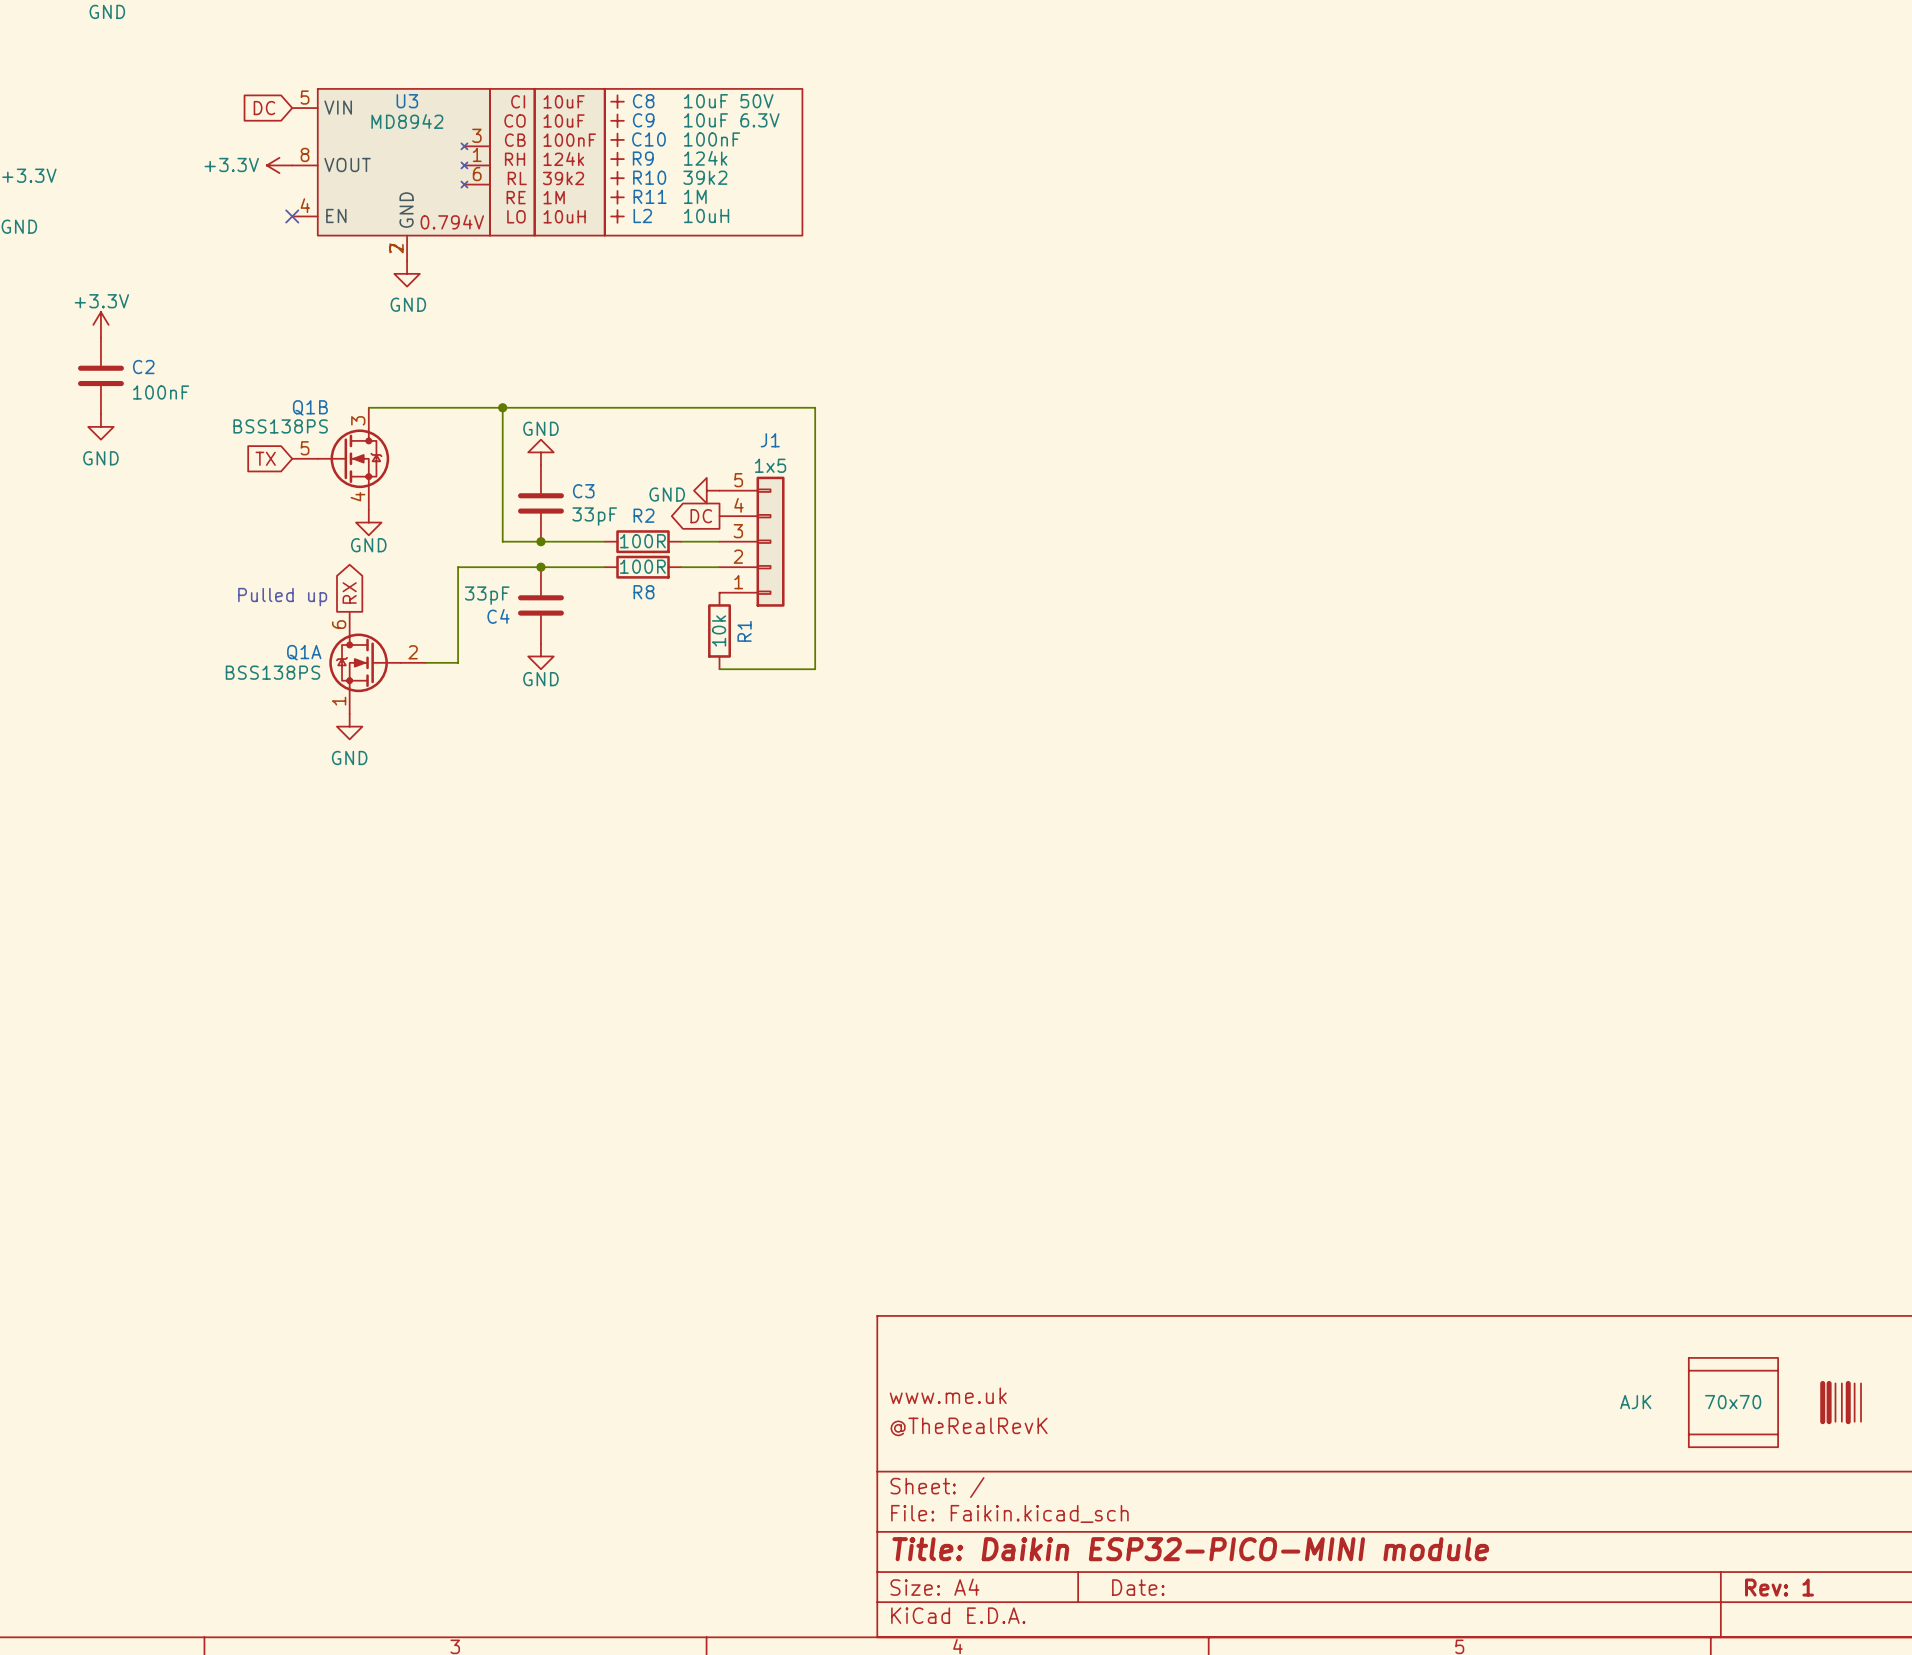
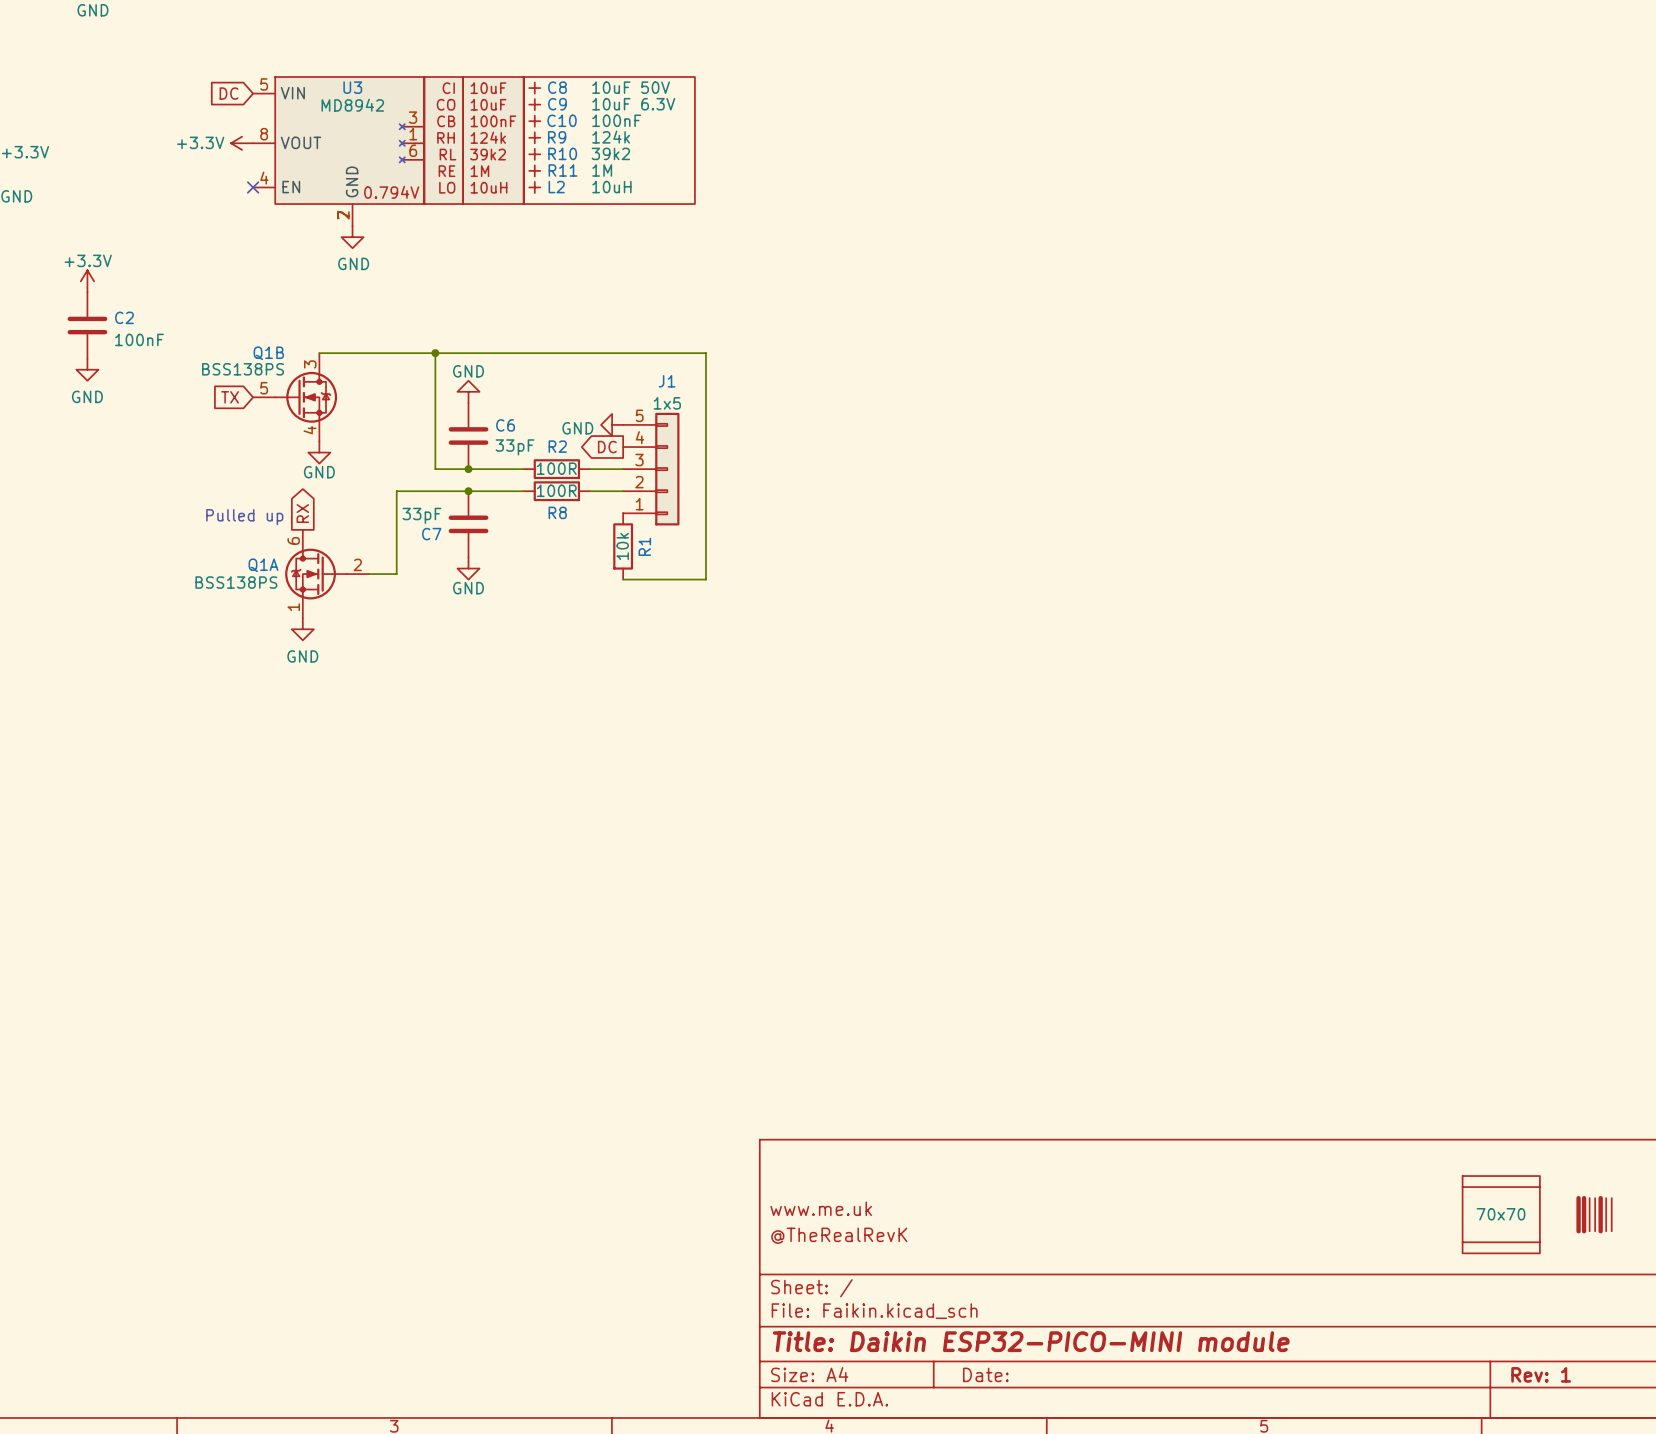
C3 name: C3 (583, 491) -> C6 (505, 425)
C4 name: C4 (498, 616) -> C7 (431, 534)
part: AJK (1635, 1402) -> none

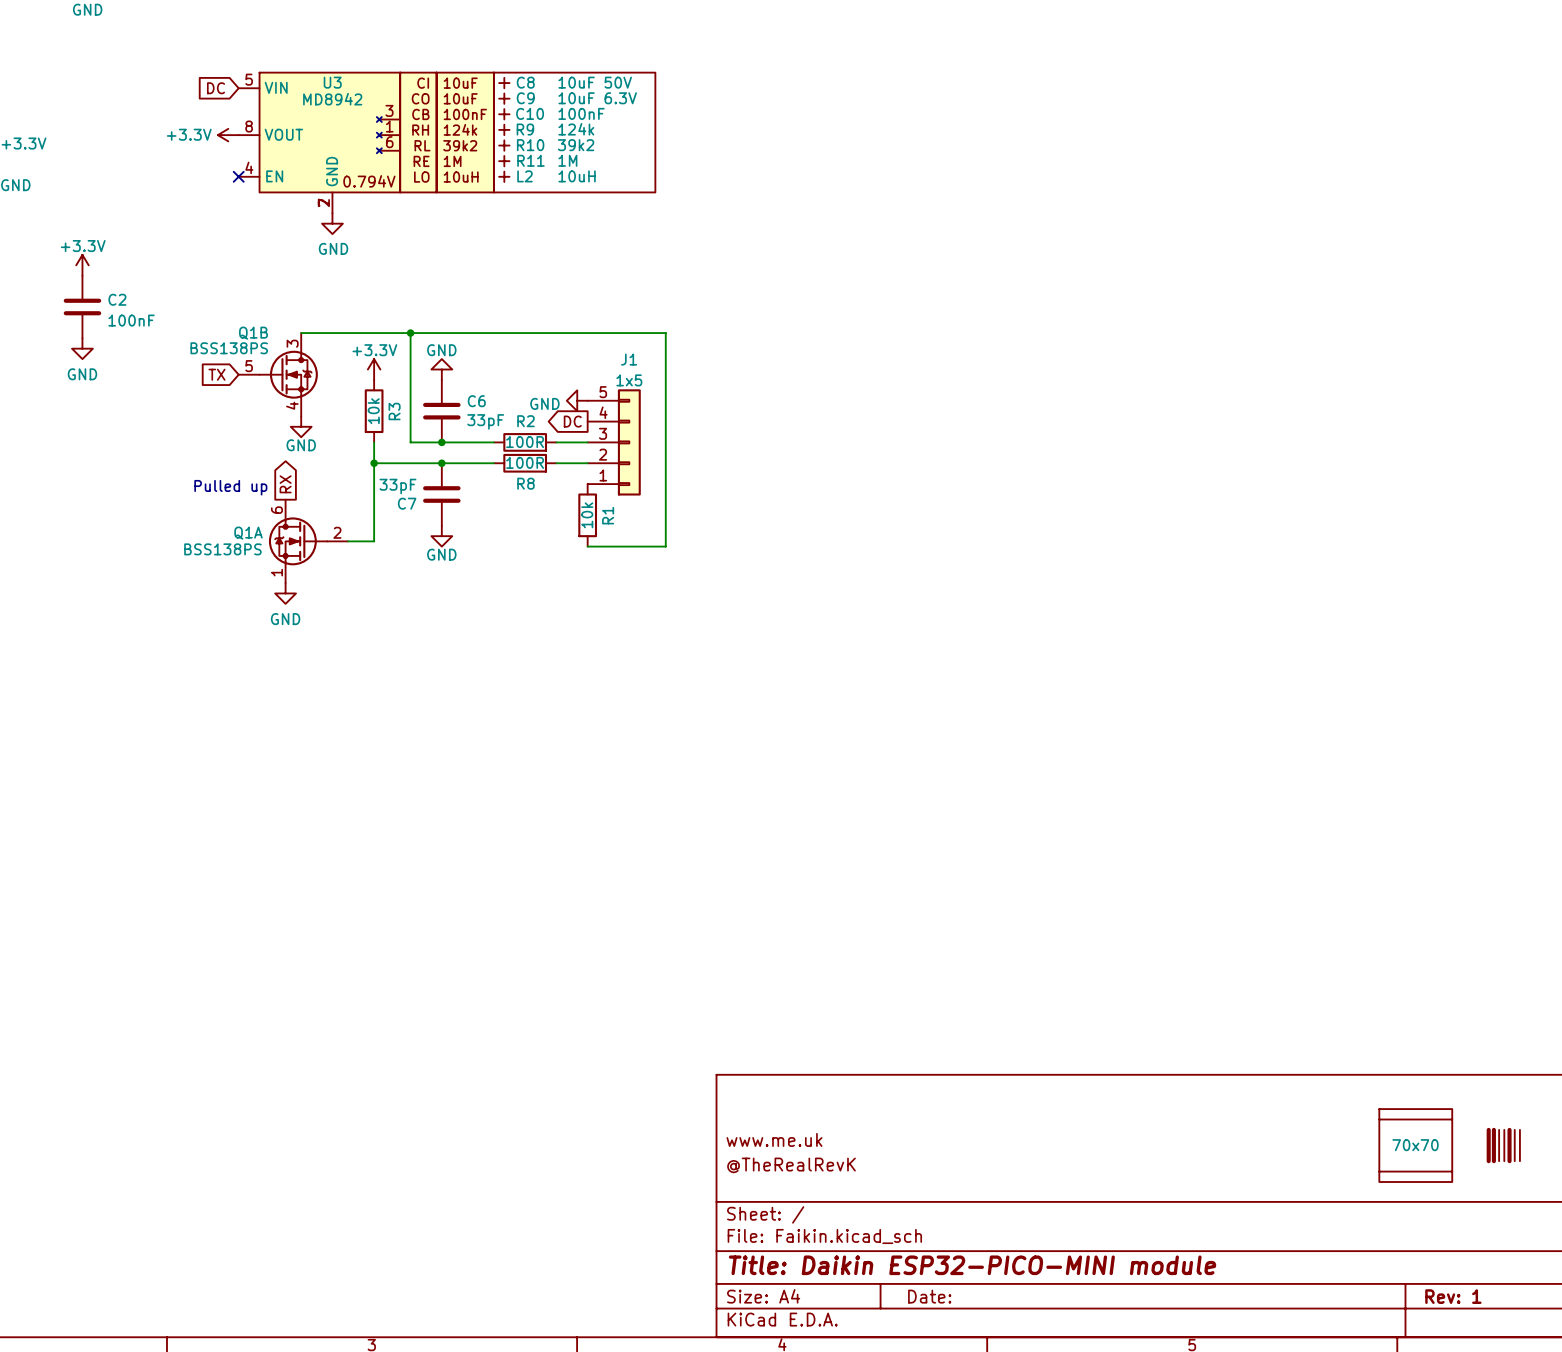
power symbol: none -> +3.3V (374, 369)
R3: none -> 10k (374, 411)
wire: none -> (374, 442) (374, 463)
junction: none -> (374, 463)

